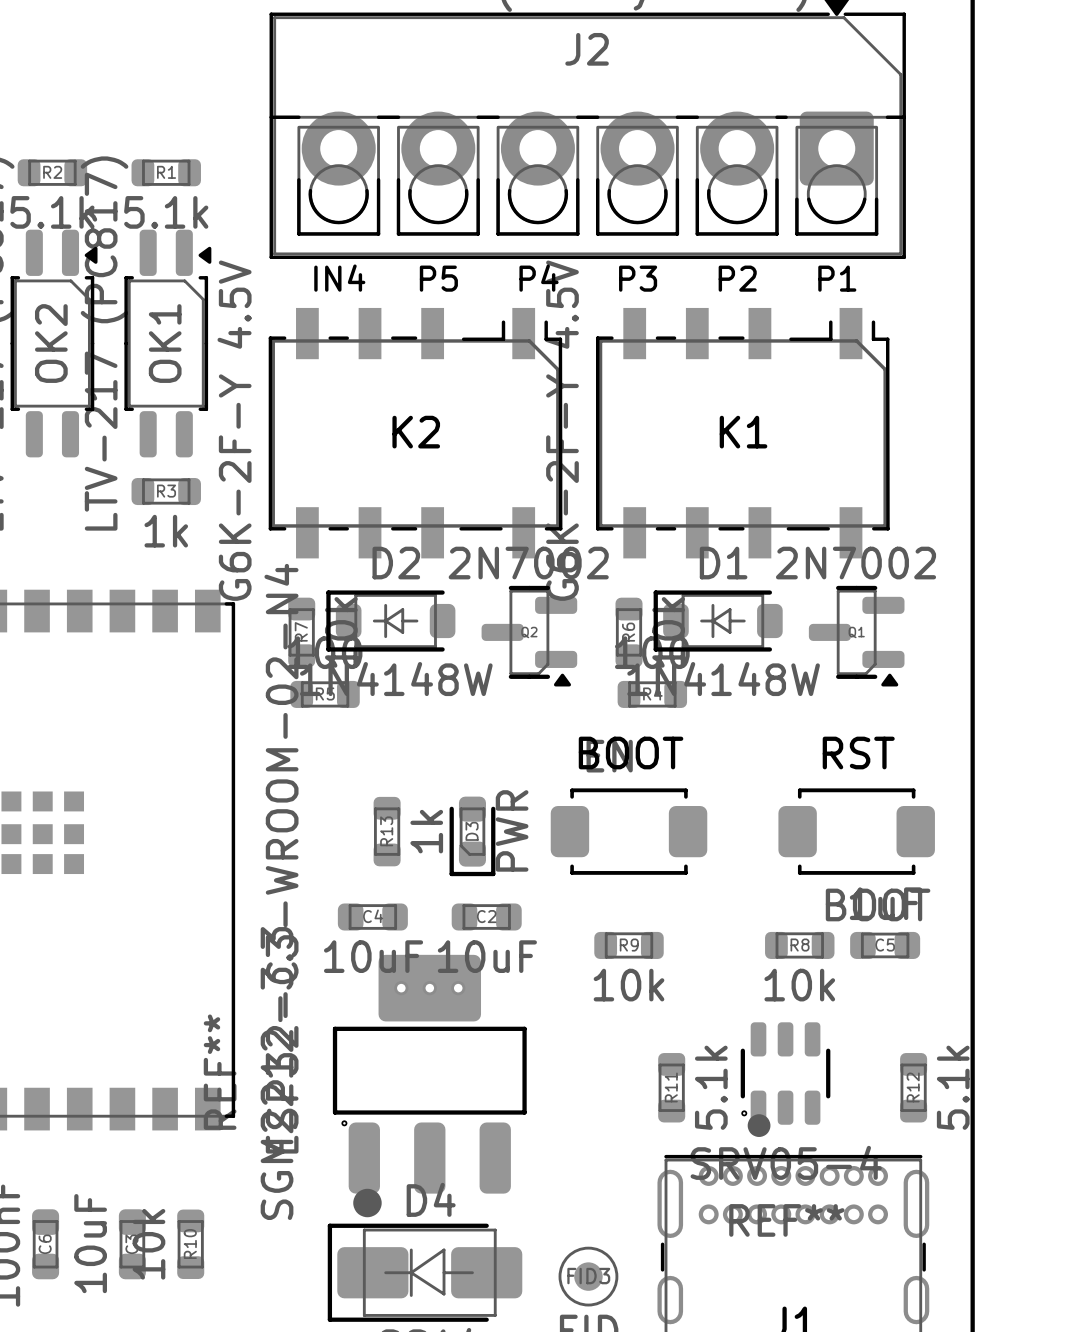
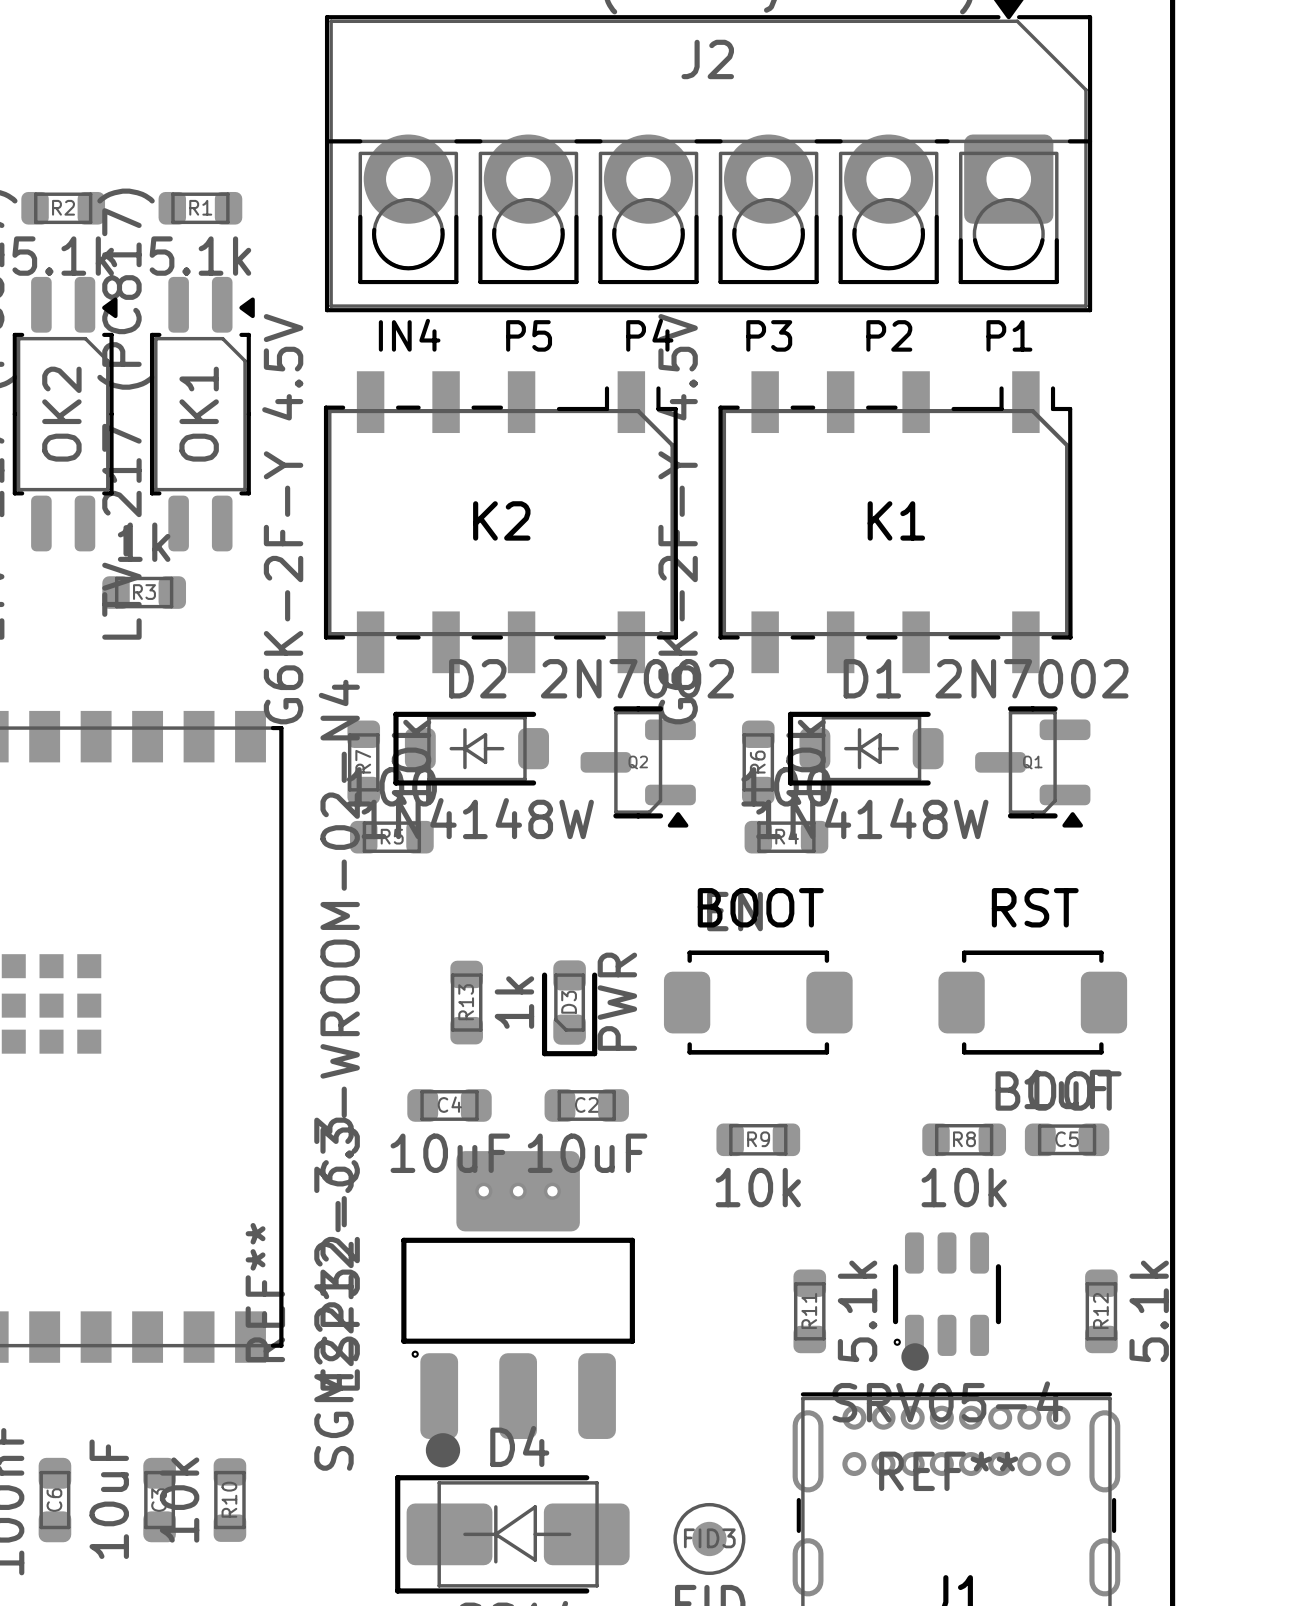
R3 position: (166, 491) -> (144, 592)
R3 value position: 1k (166, 531) -> 1k (144, 542)

